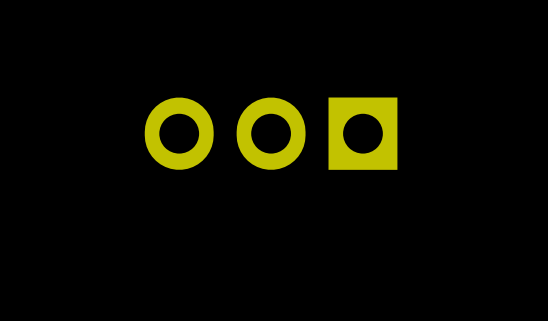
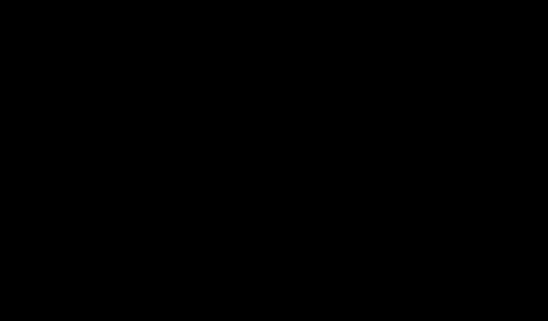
part: (271, 133) -> none

